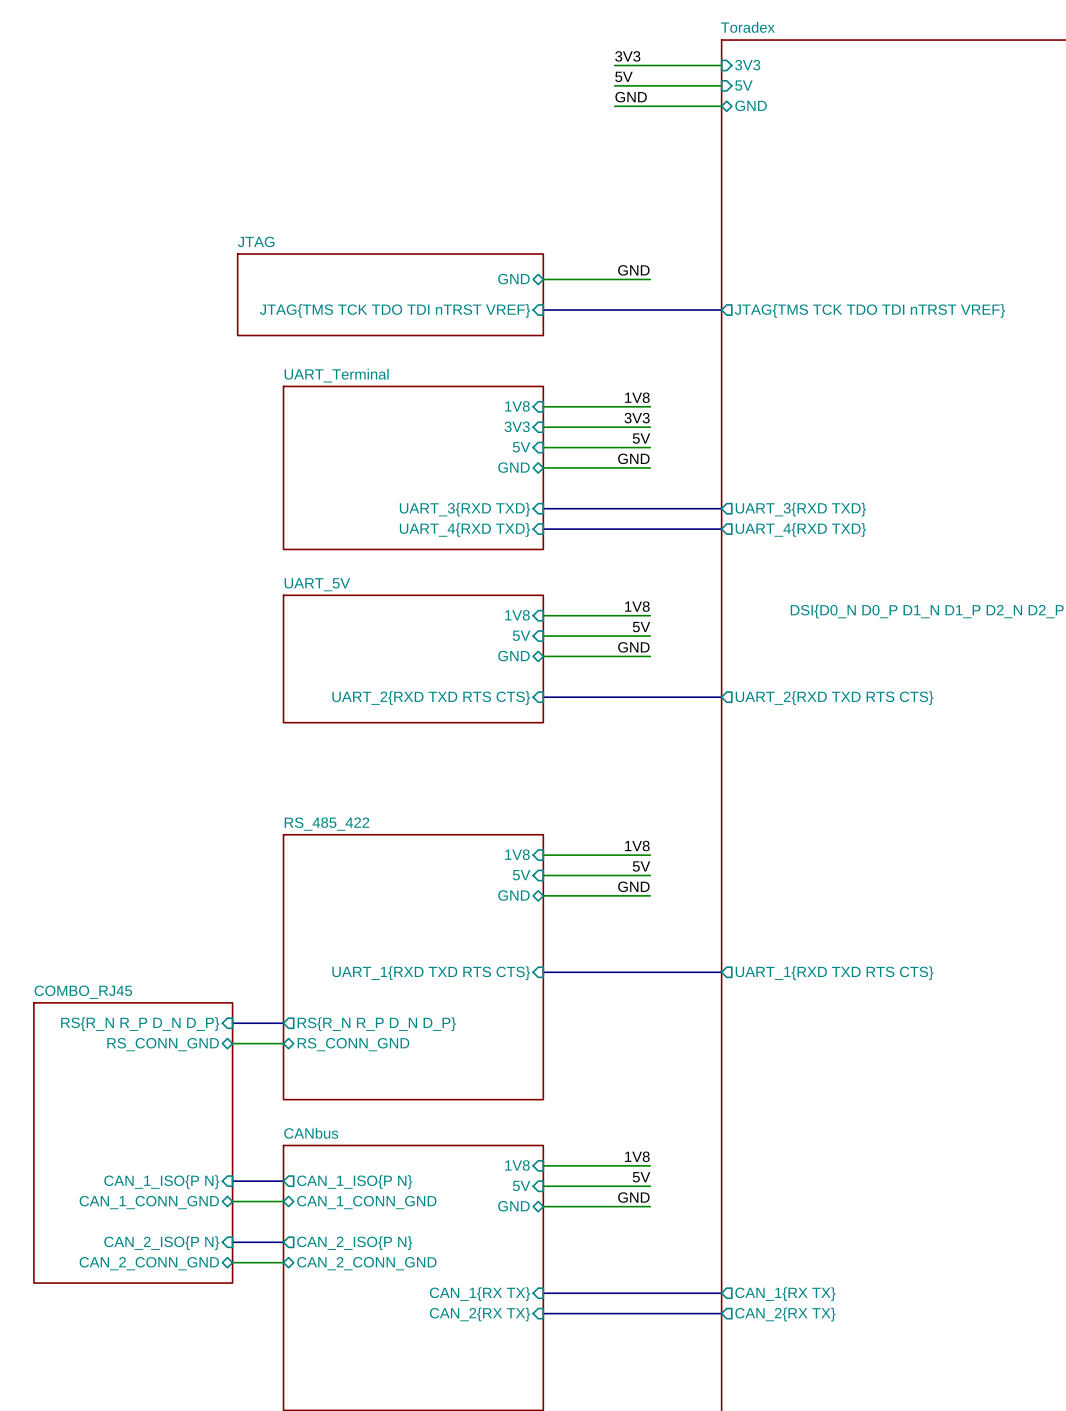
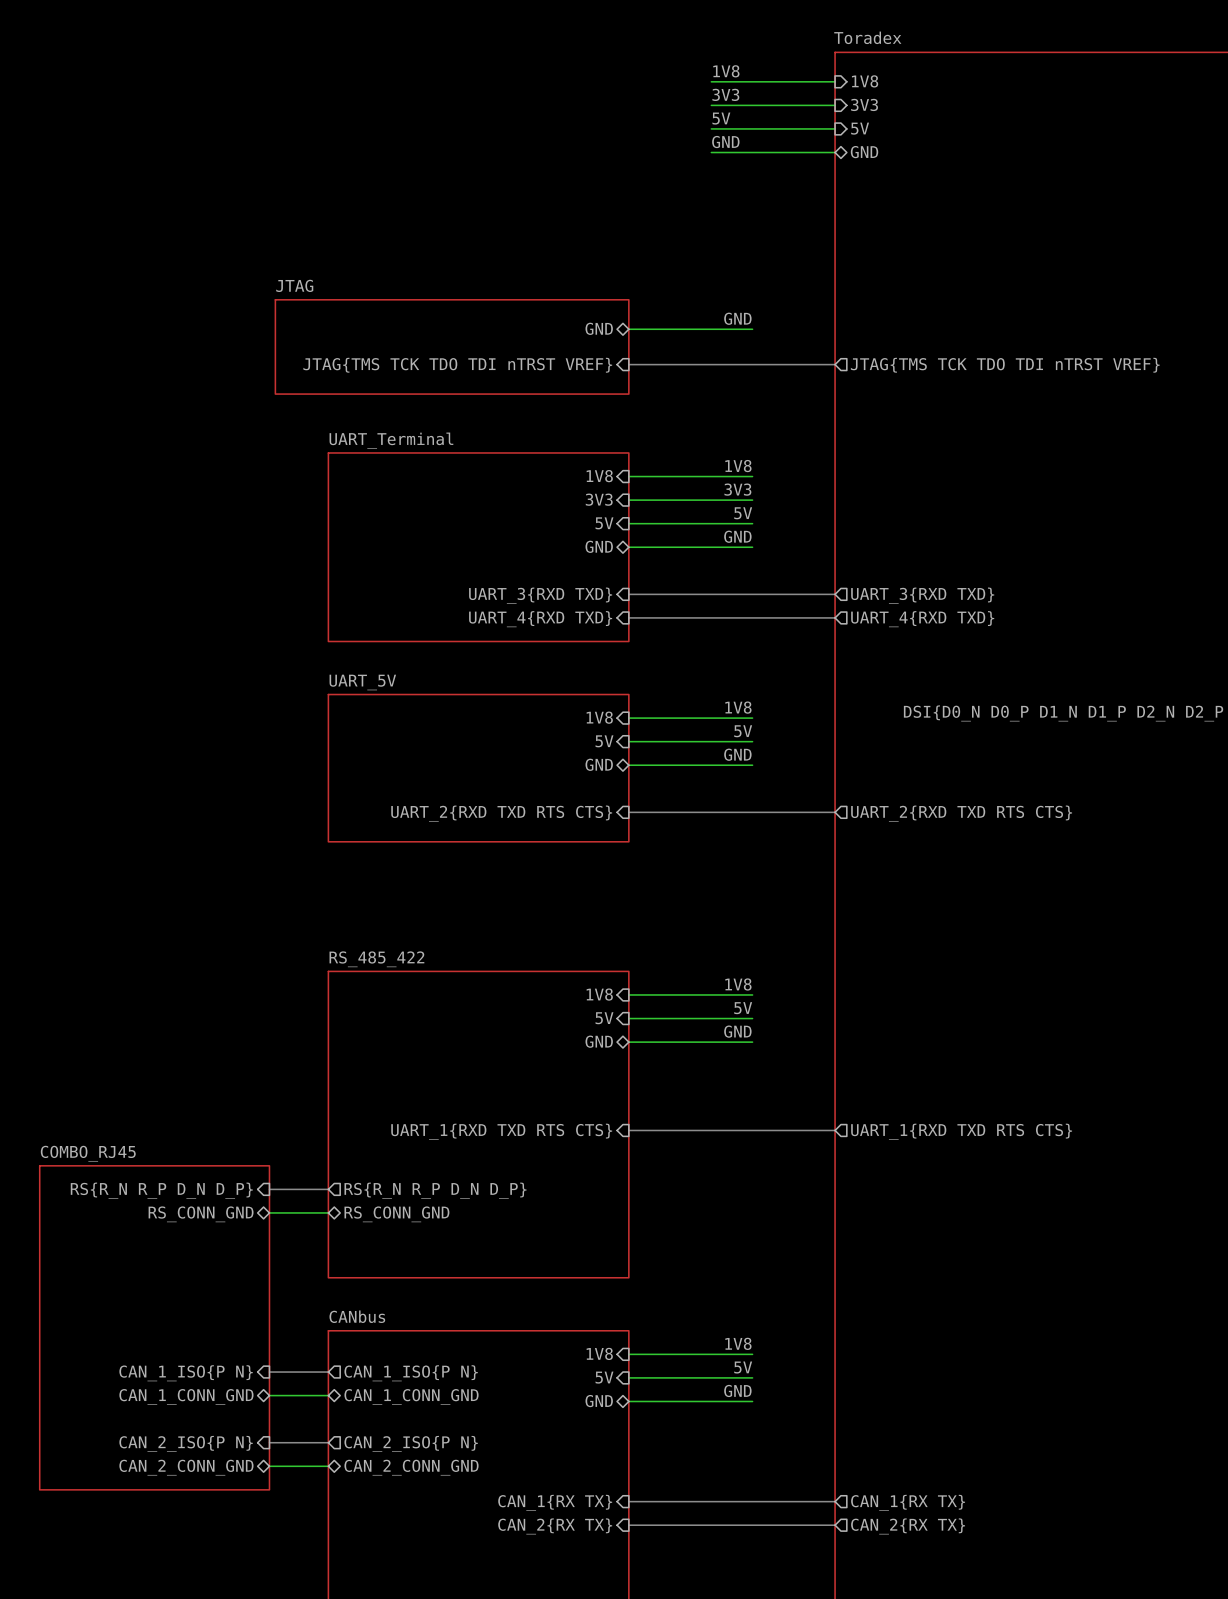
label: 3V3 (627, 56) -> 1V8 (726, 71)
sheet pin: 3V3 (747, 65) -> 1V8 (865, 81)
label: 5V (623, 76) -> 3V3 (725, 94)
sheet pin: 5V (743, 85) -> 3V3 (864, 104)
label: GND (631, 97) -> 5V (721, 118)
sheet pin shape: bidirectional (751, 105) -> input (860, 128)
sheet pin: GND (751, 105) -> 5V (860, 128)
label: none -> GND (725, 142)
wire: none -> (711, 152) (835, 152)
sheet pin: none -> GND (864, 152)

